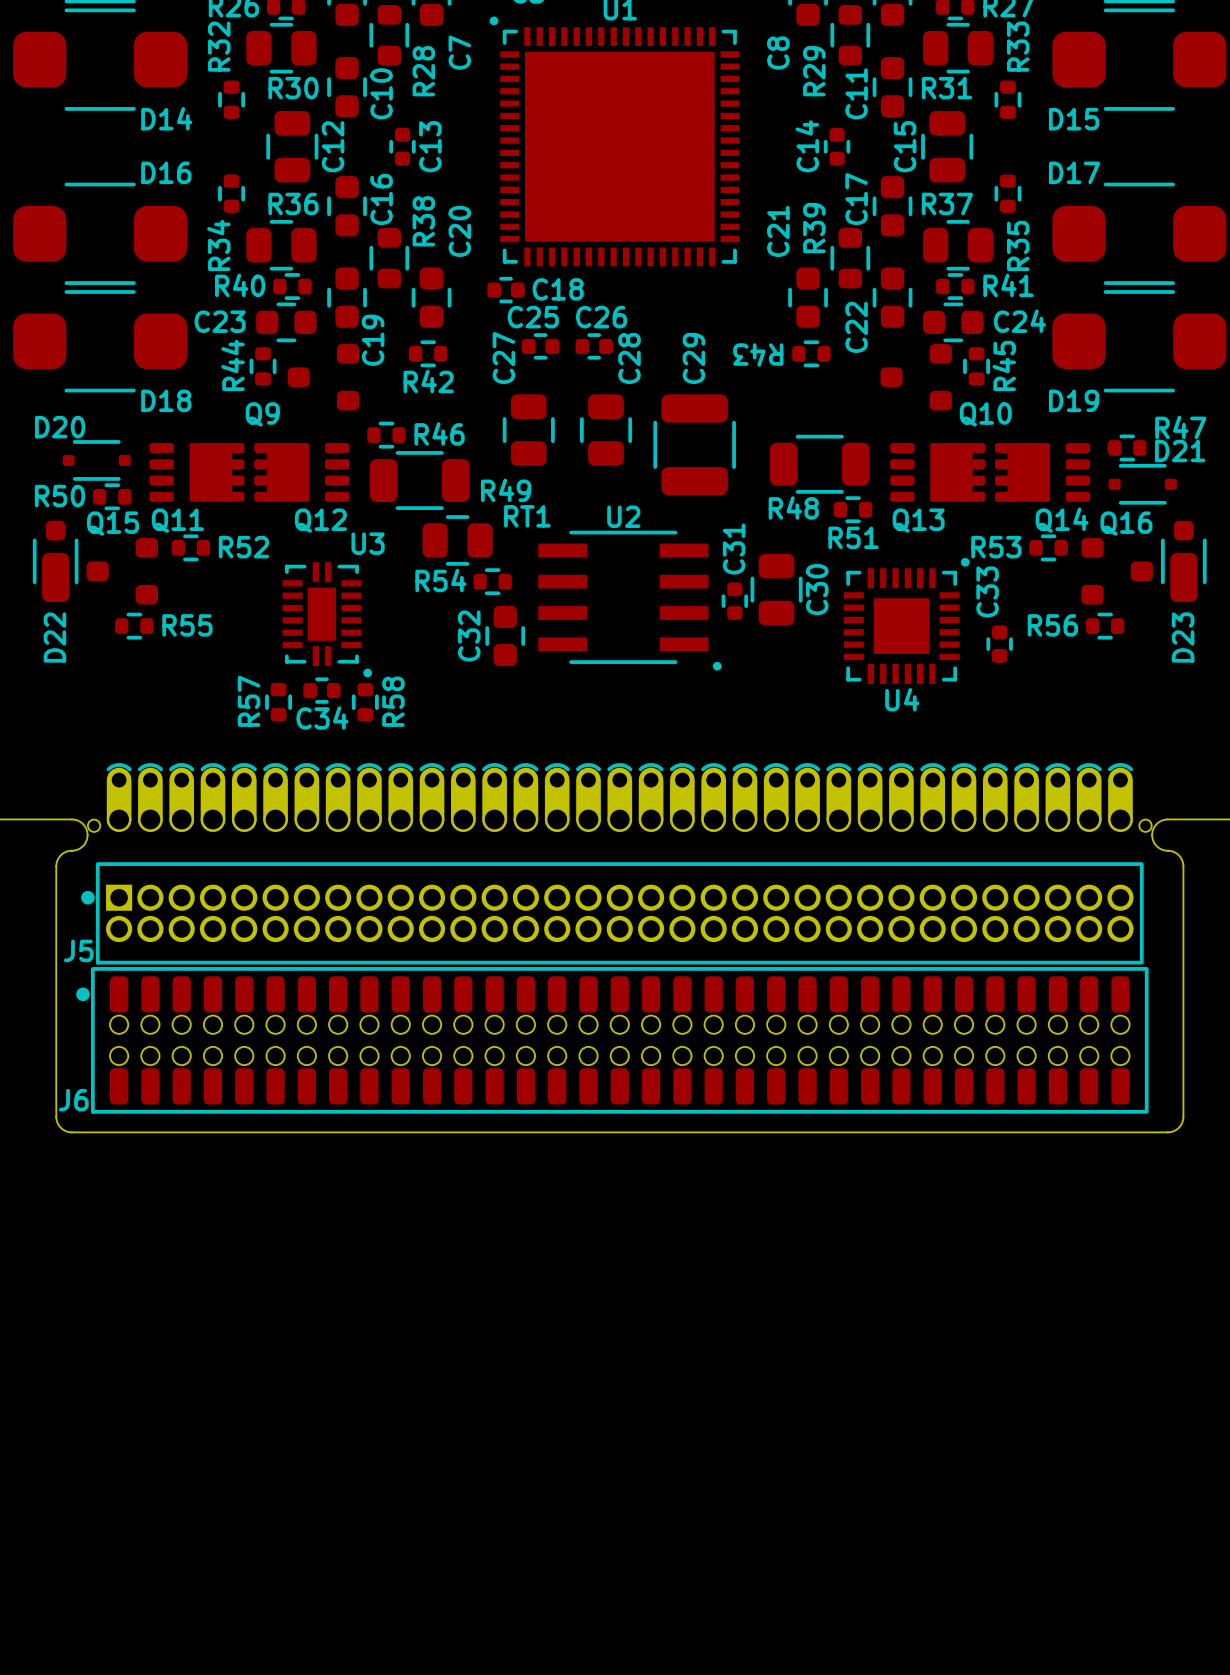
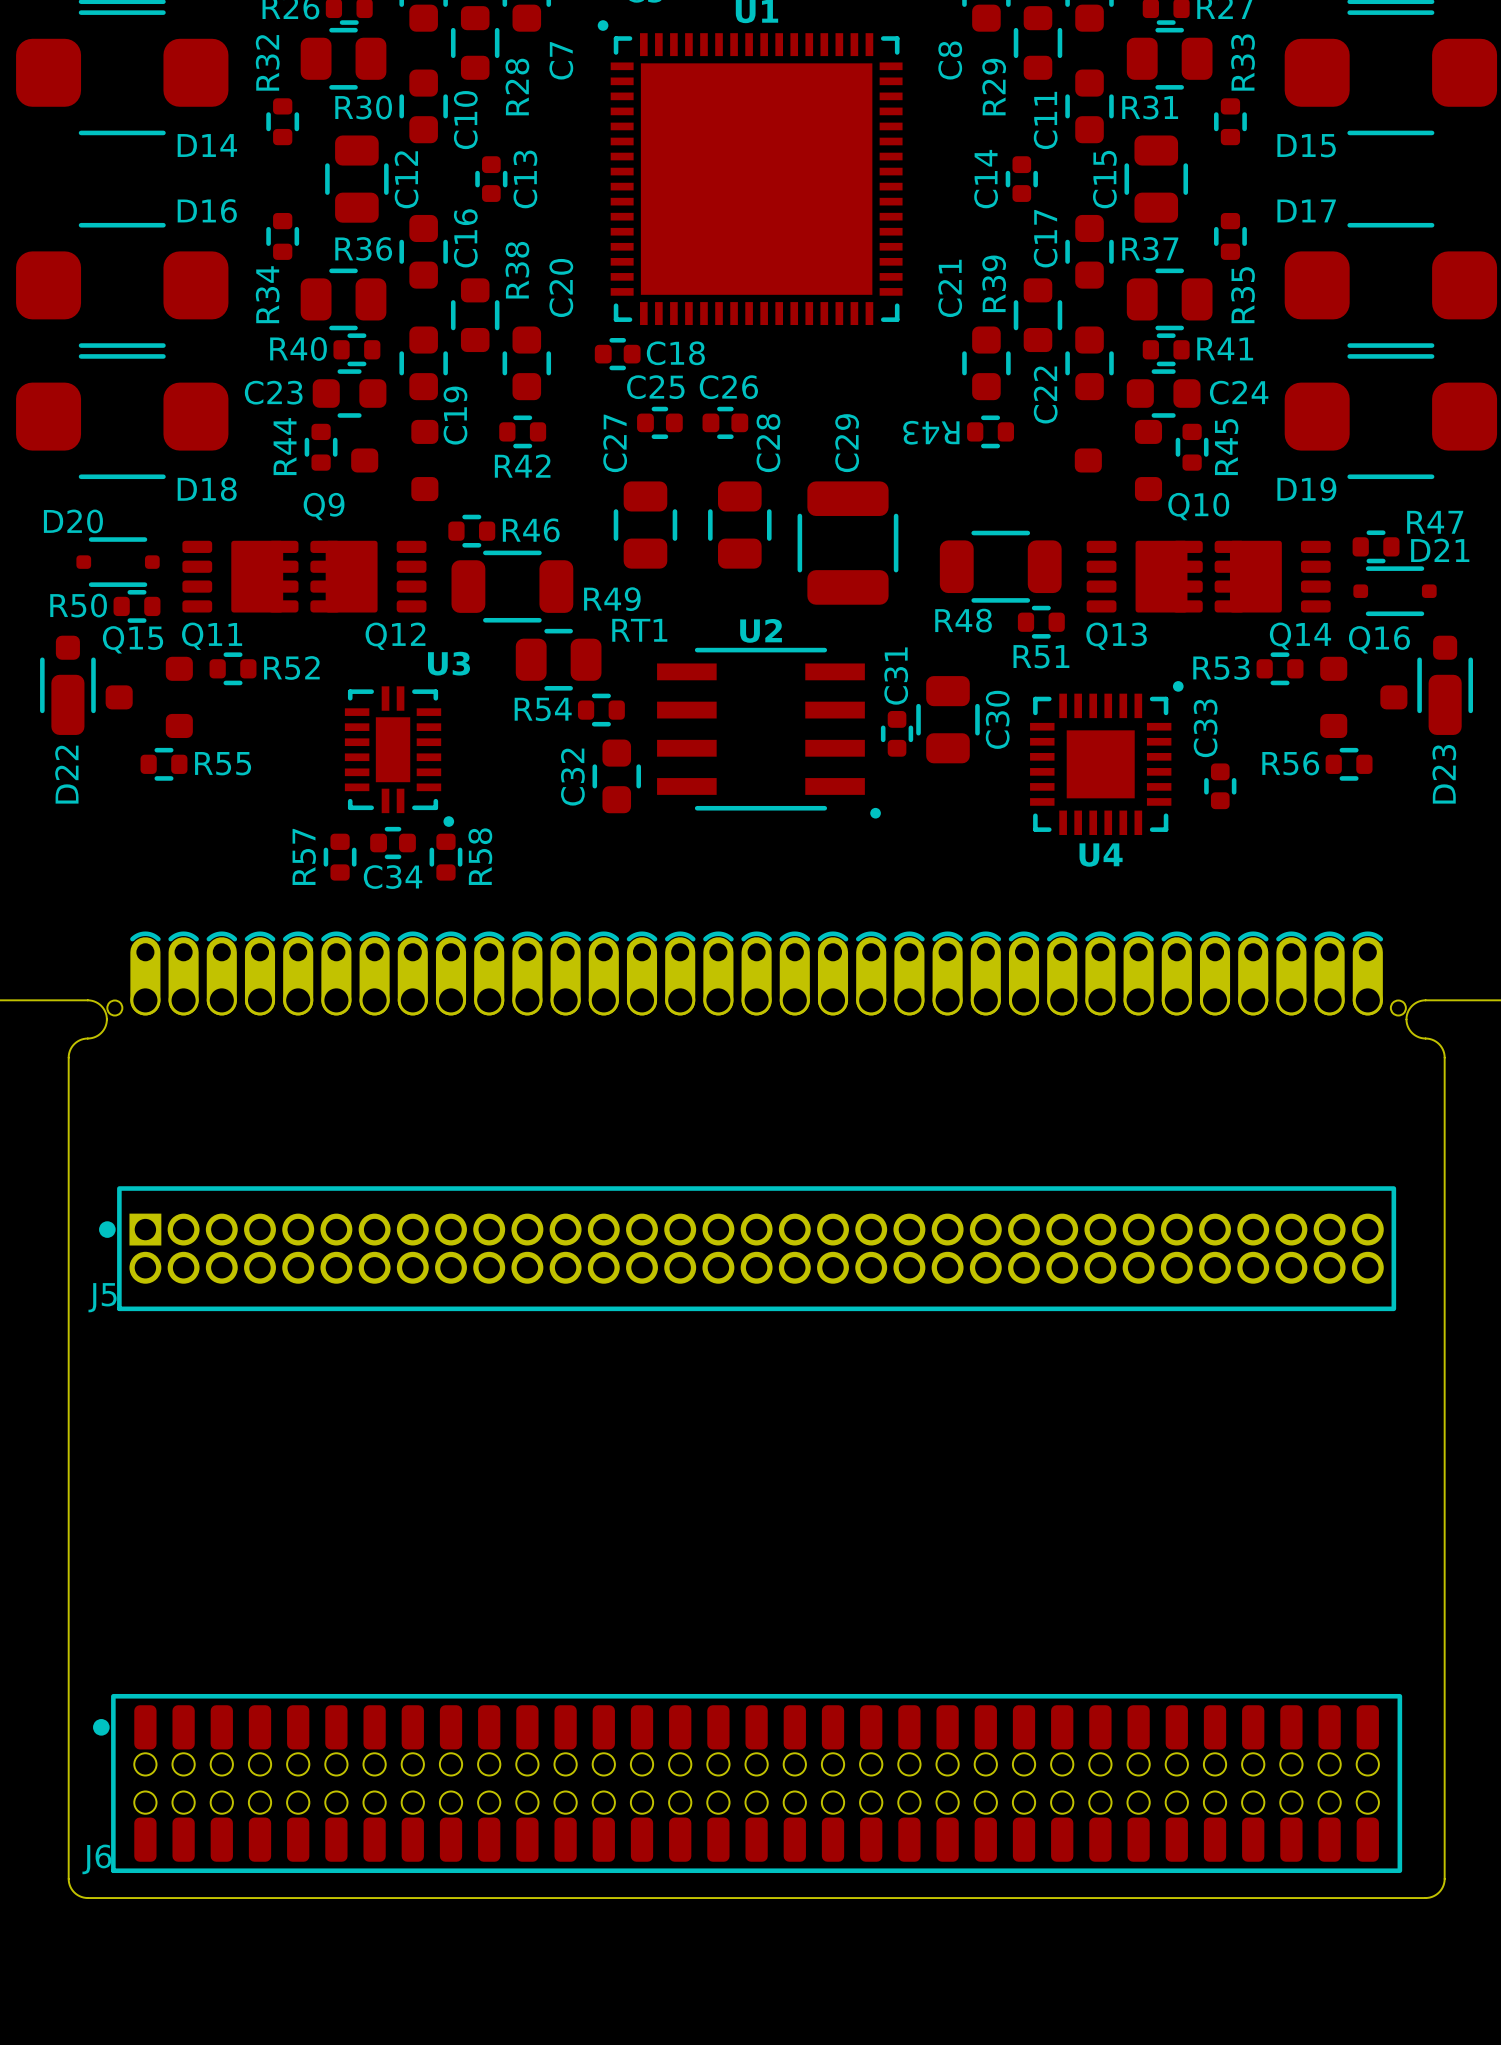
J5 position: (612, 913) -> (747, 1248)
J6 position: (612, 1040) -> (747, 1783)
board edge: (56, 1116) (60, 1127) (71, 1132) (1167, 1132) (1178, 1127) (1183, 1116) -> (68, 1363) (68, 1878) (74, 1892) (87, 1898) (1431, 1896) (1440, 1890) (1444, 1878) (1444, 1363)

